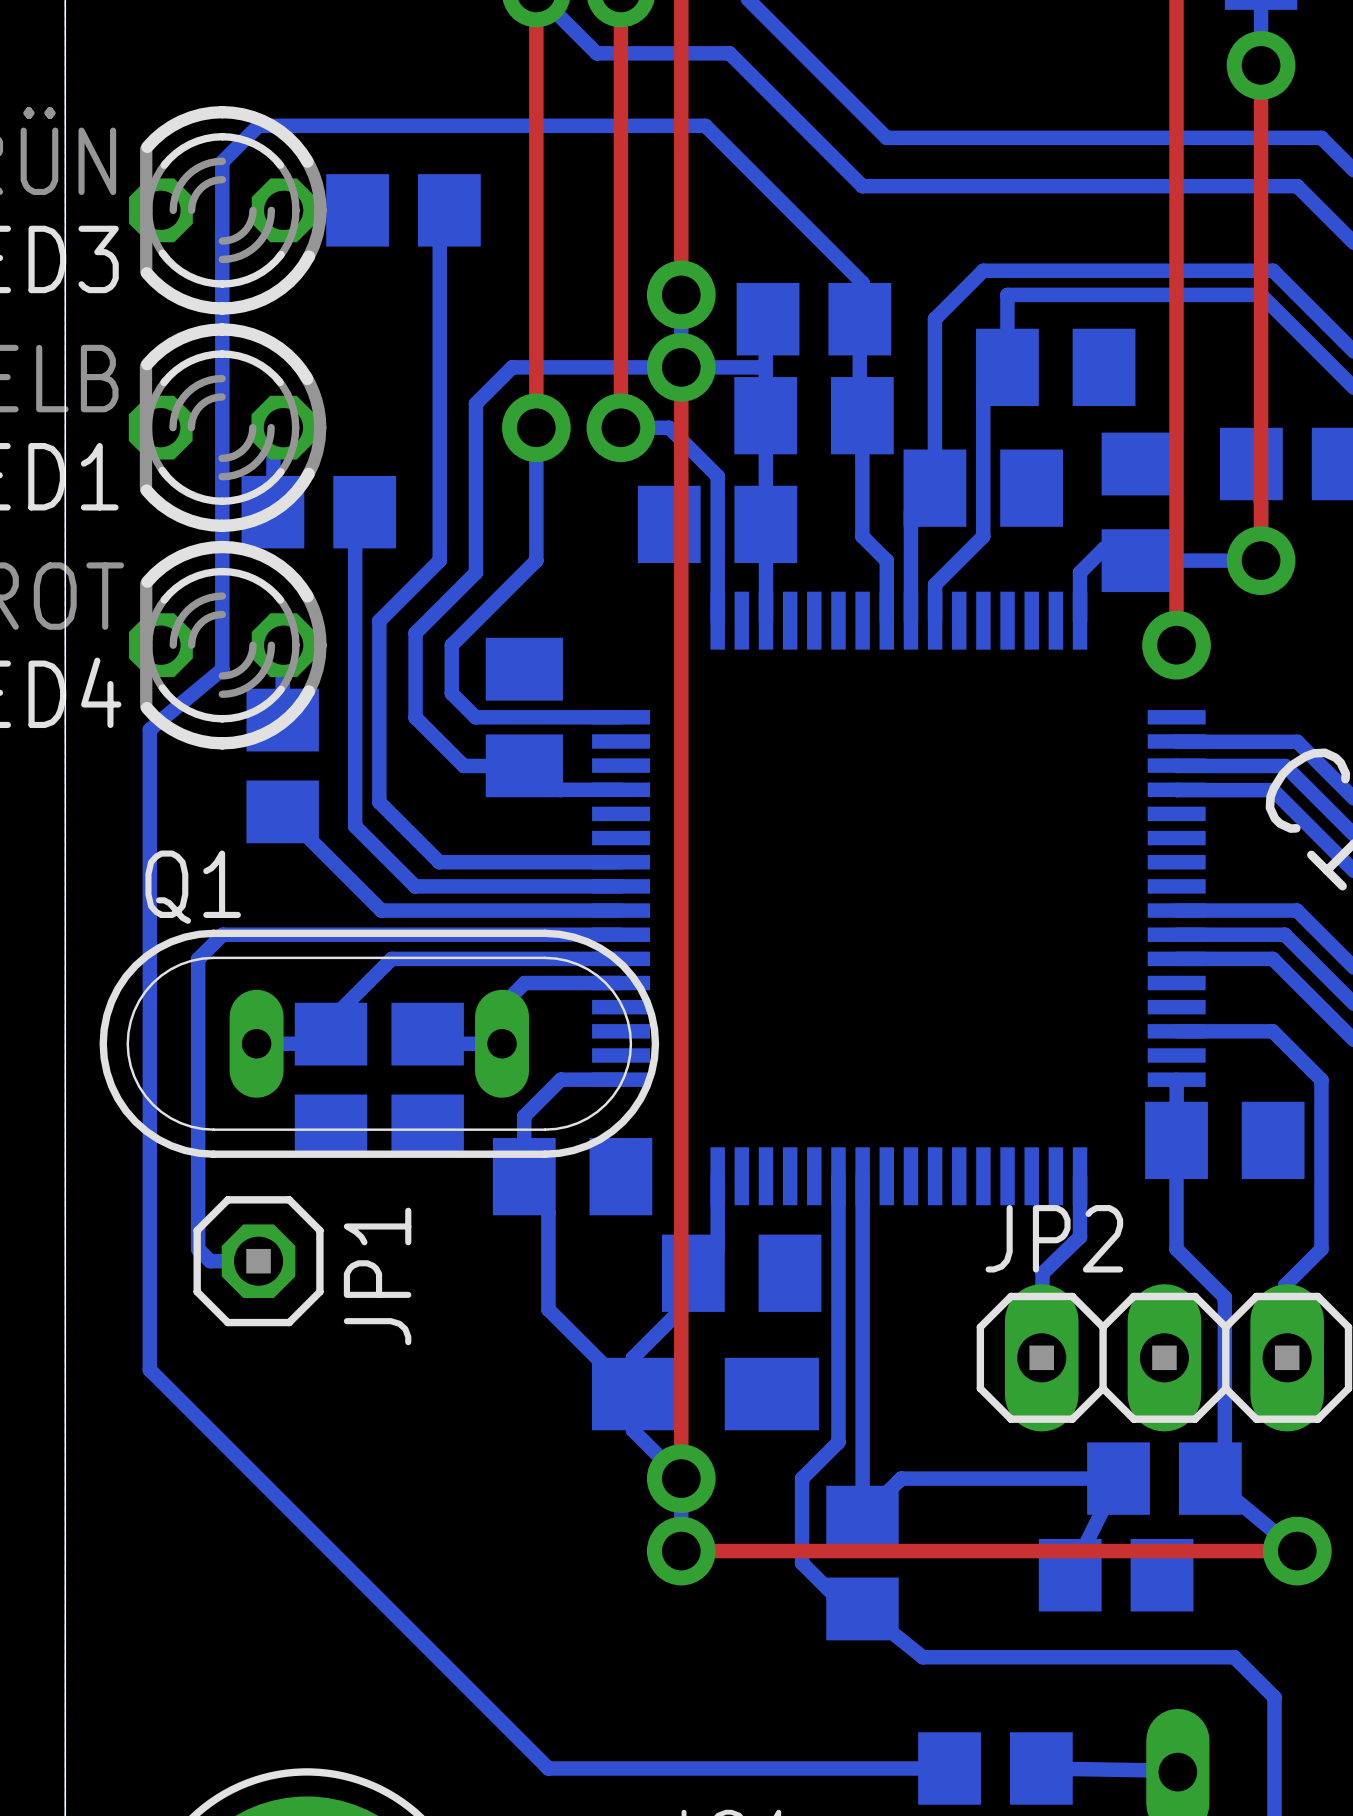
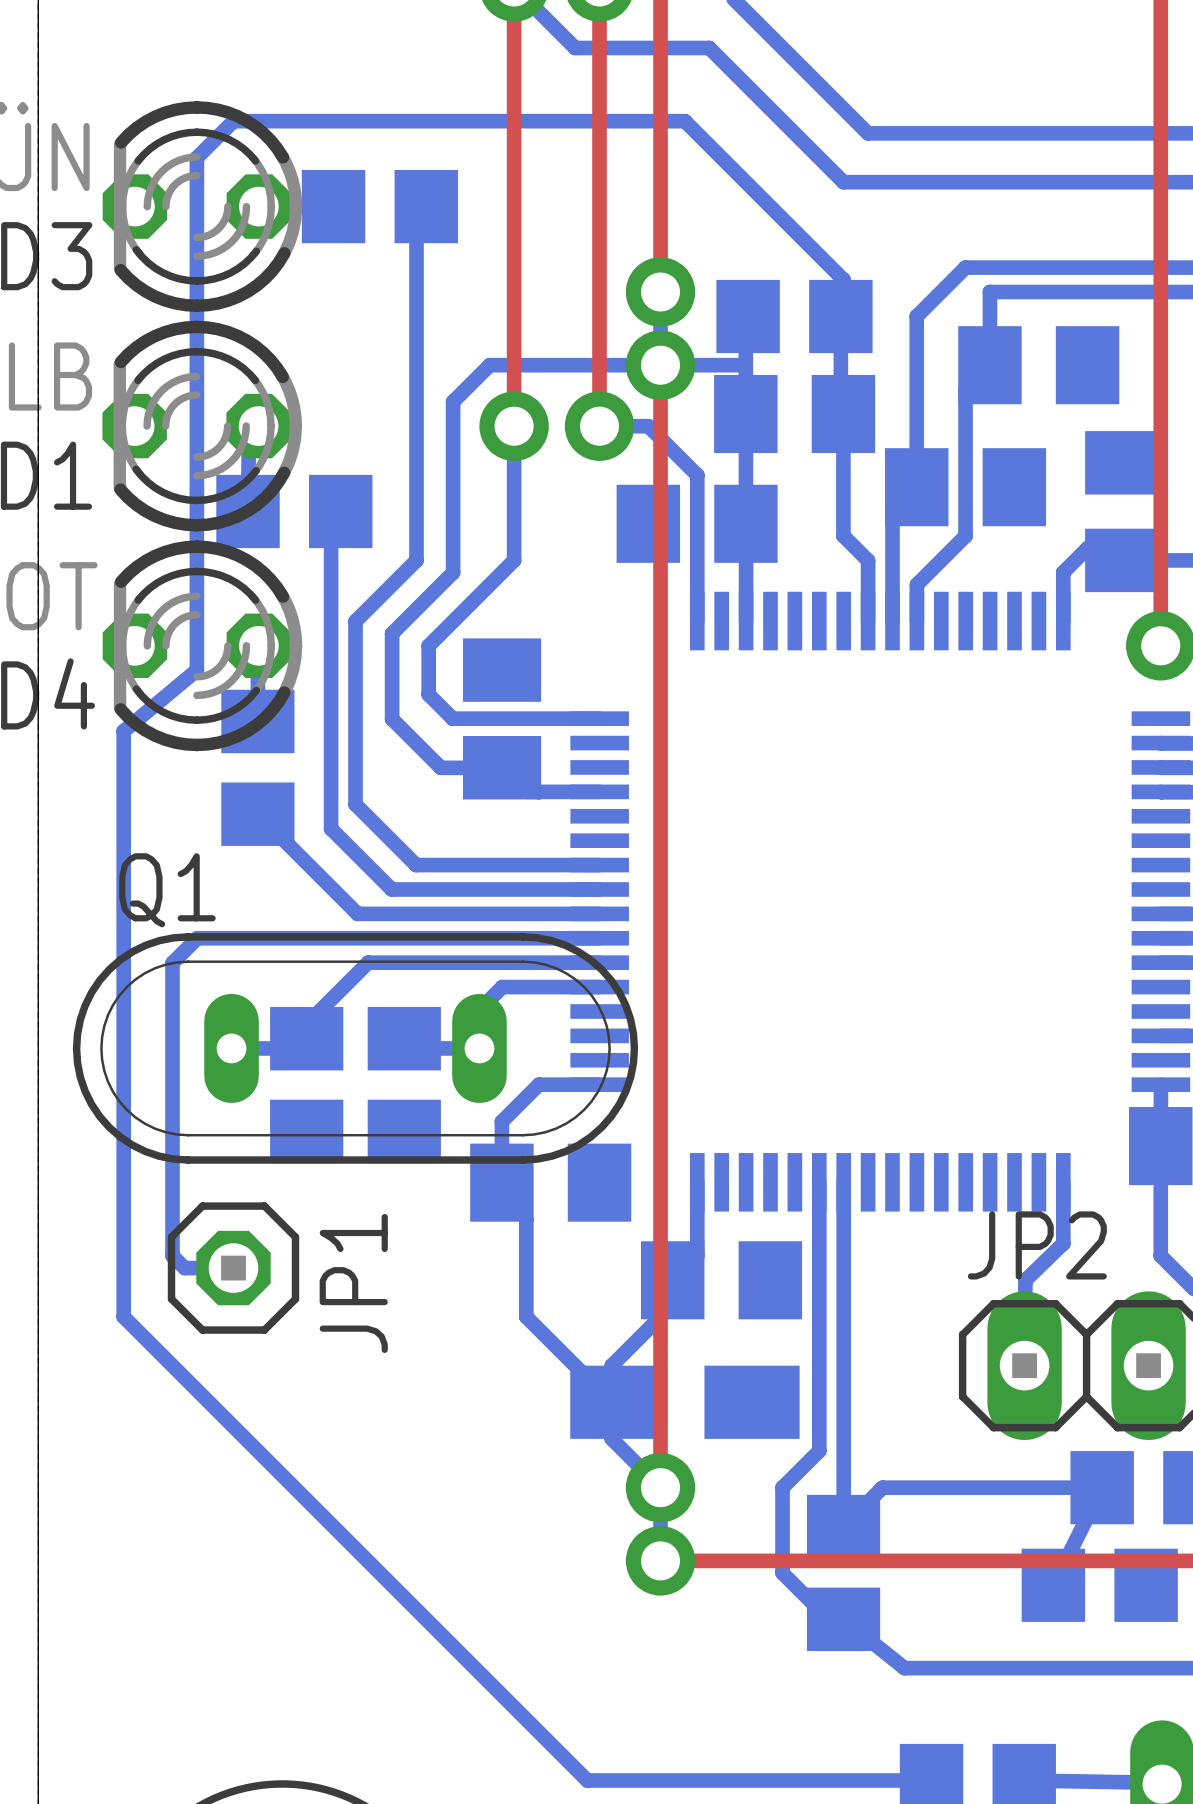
bottom track: (149, 1309) (149, 1369) (548, 1768) (608, 1768) -> (123, 1316) (587, 1780)

